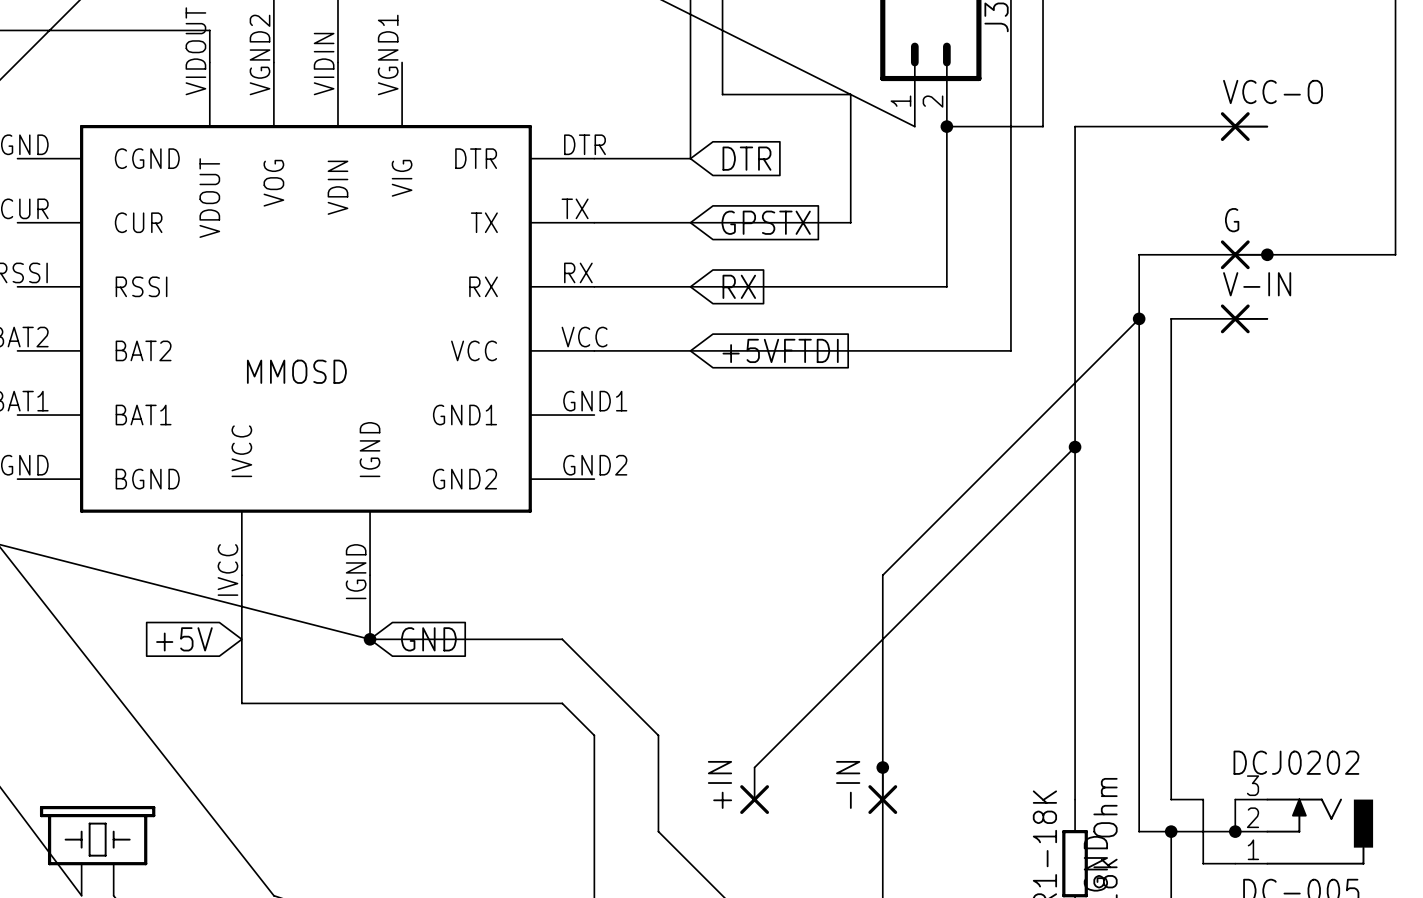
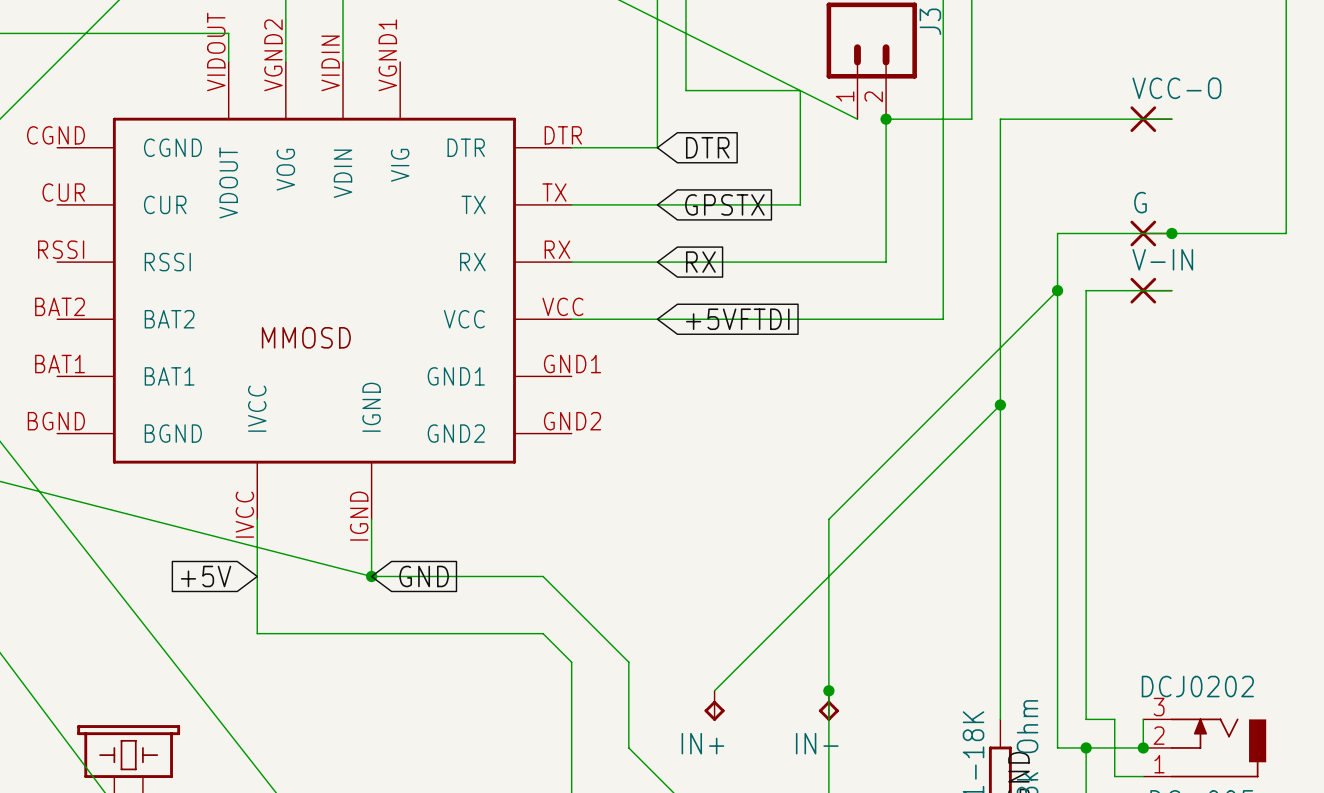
IN+: none -> (714, 705)
IN-: none -> (828, 705)
+IN: (754, 790) -> none
-IN: (882, 790) -> none

